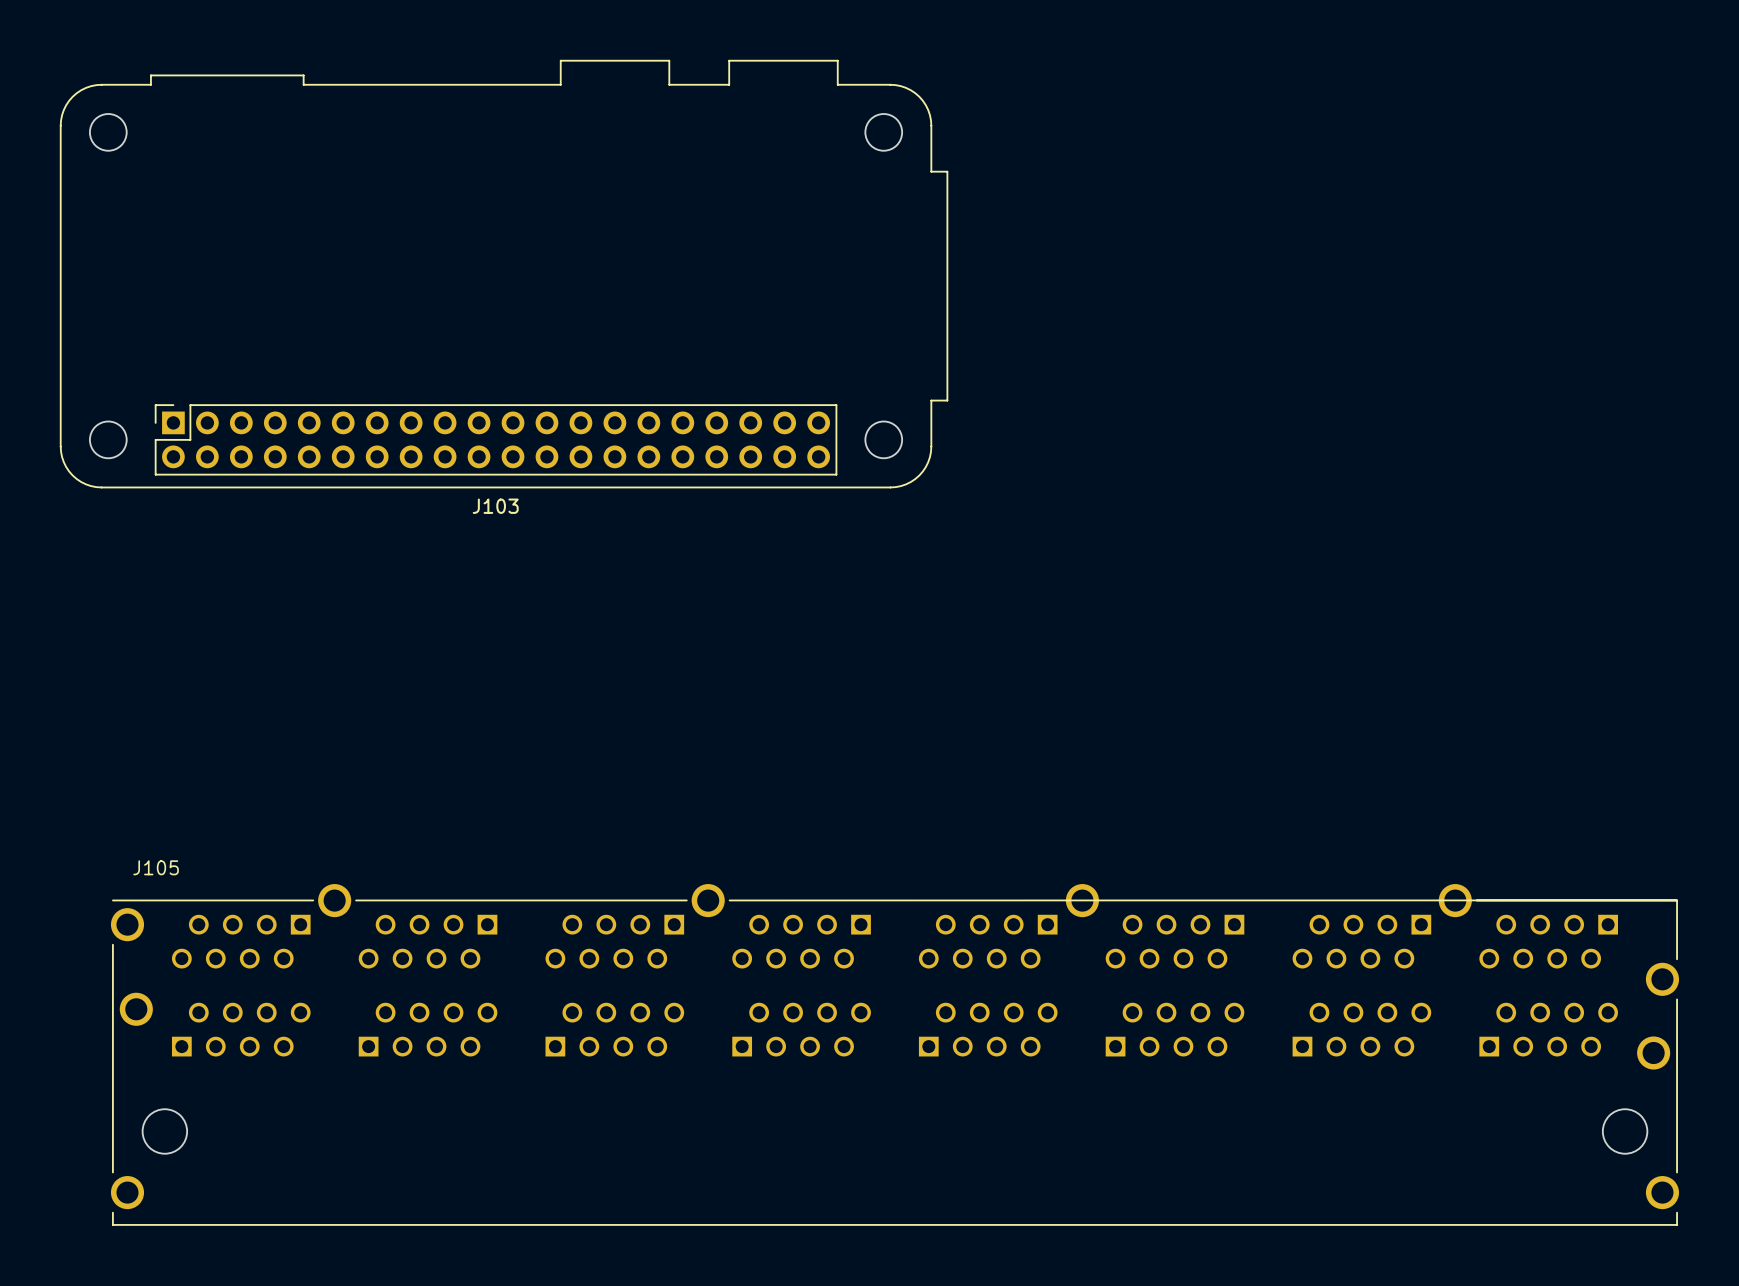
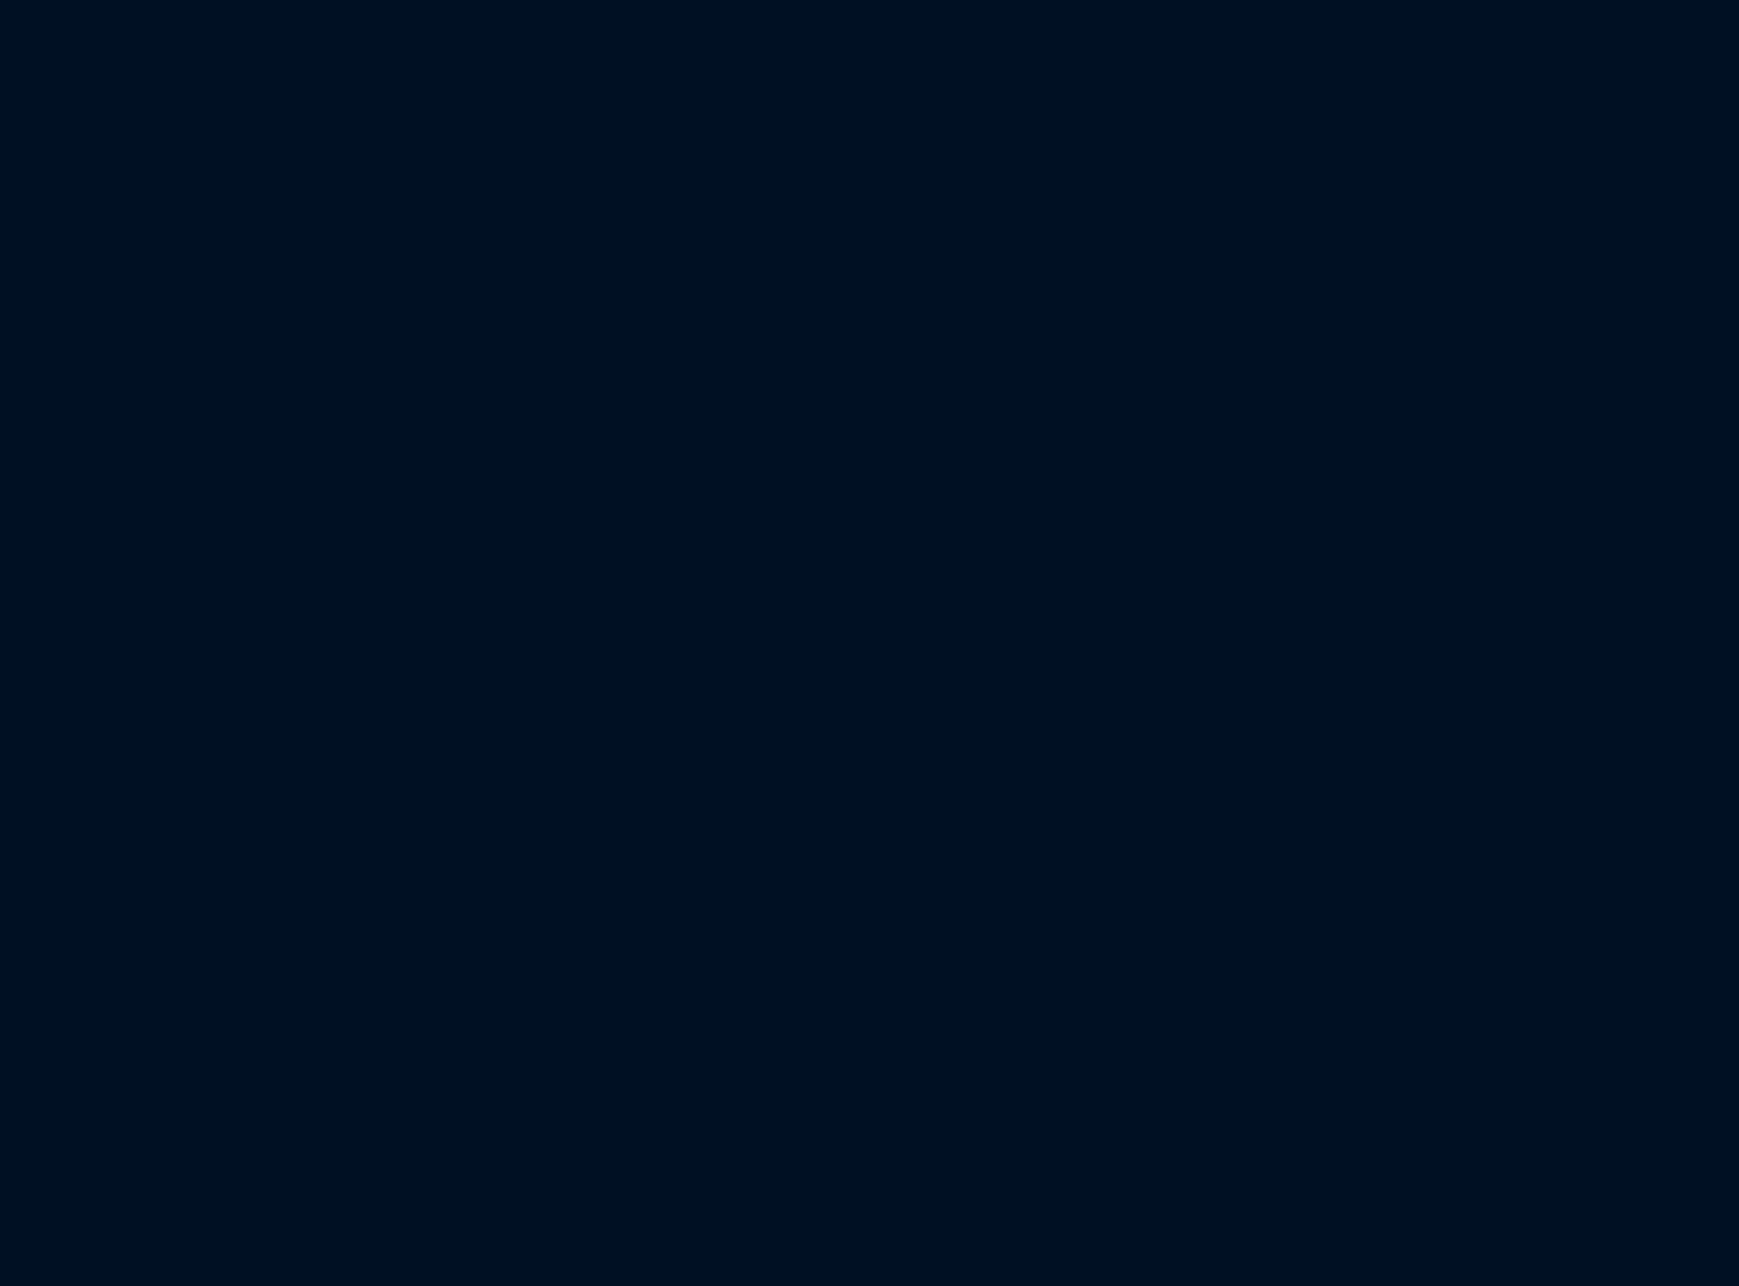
J103: (504, 274) -> none
J105: (894, 1054) -> none

